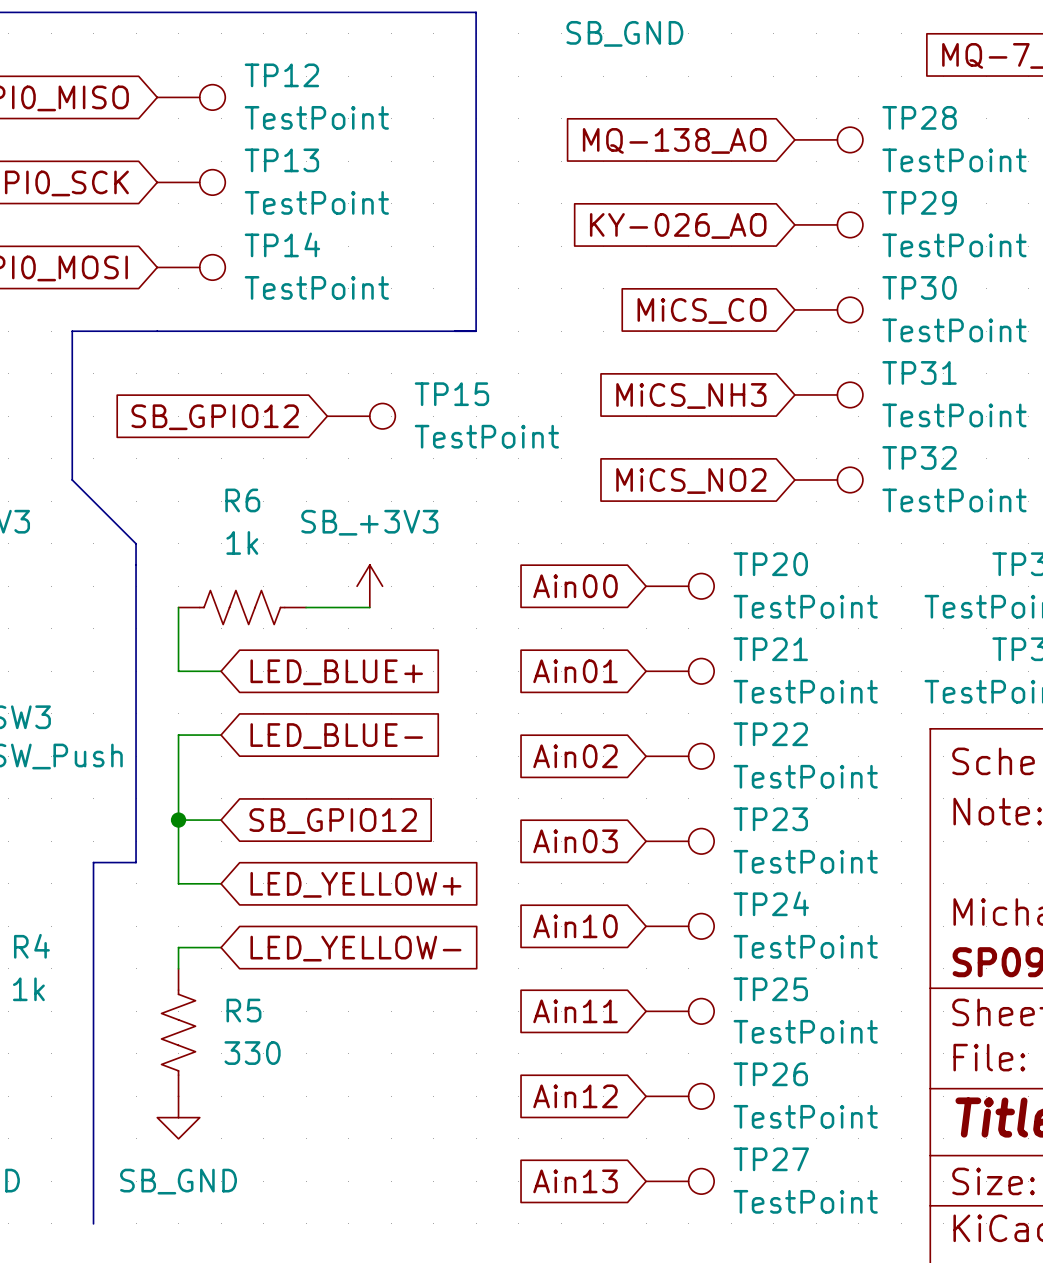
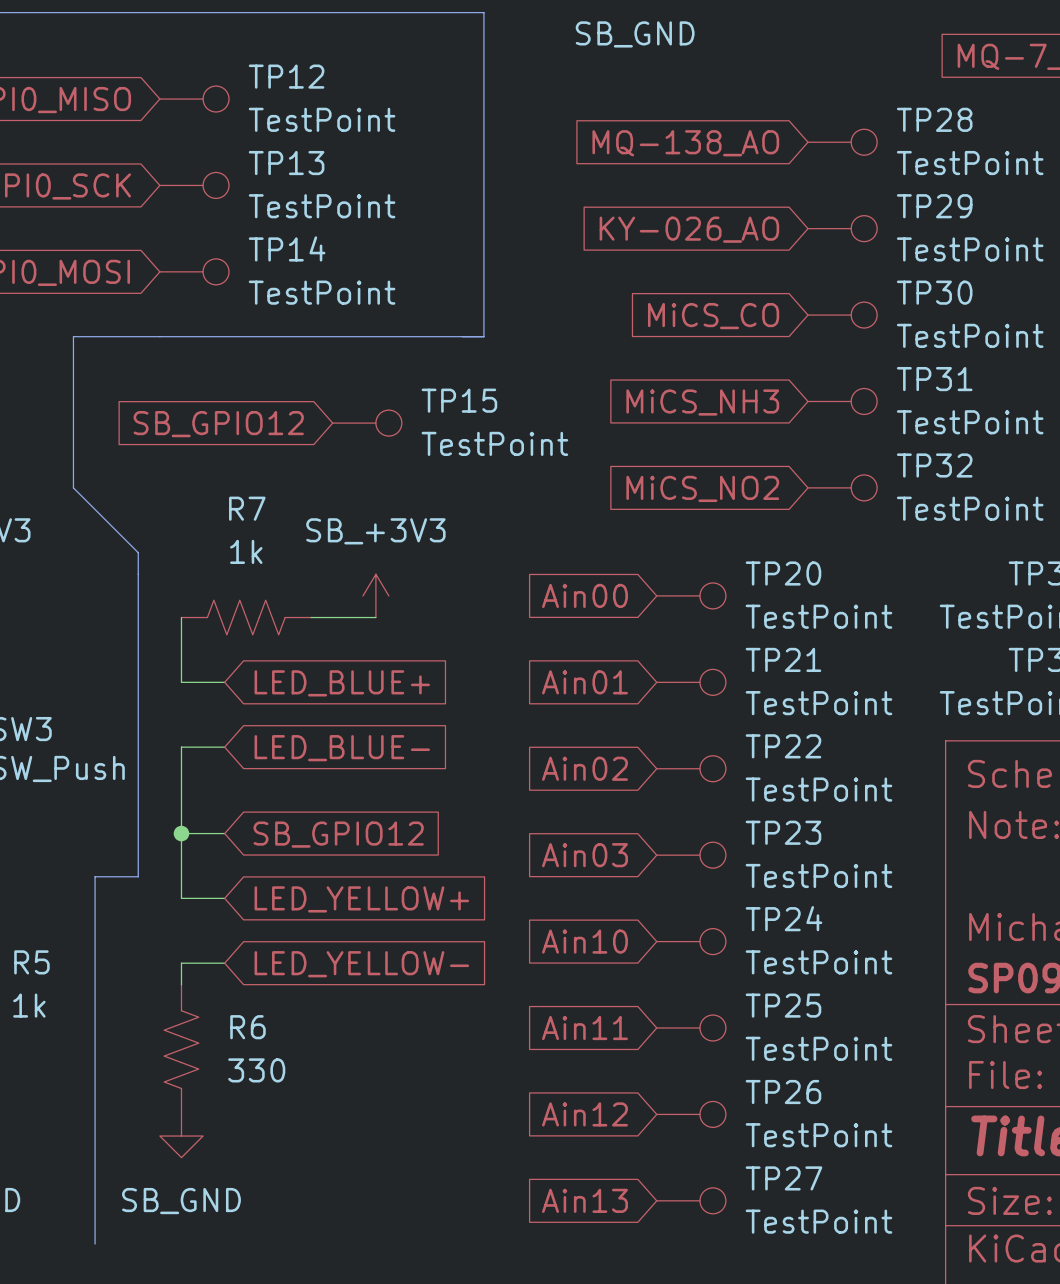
R6 name: R6 (242, 500) -> R7 (247, 508)
R4 name: R4 (31, 946) -> R5 (31, 962)
R5 name: R5 (243, 1010) -> R6 (247, 1027)

